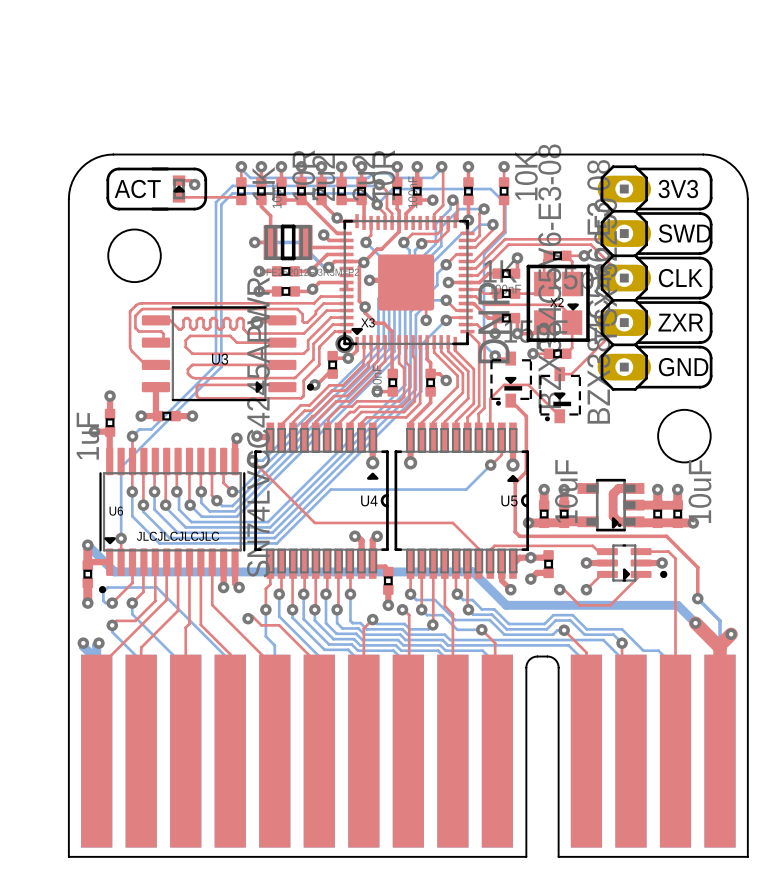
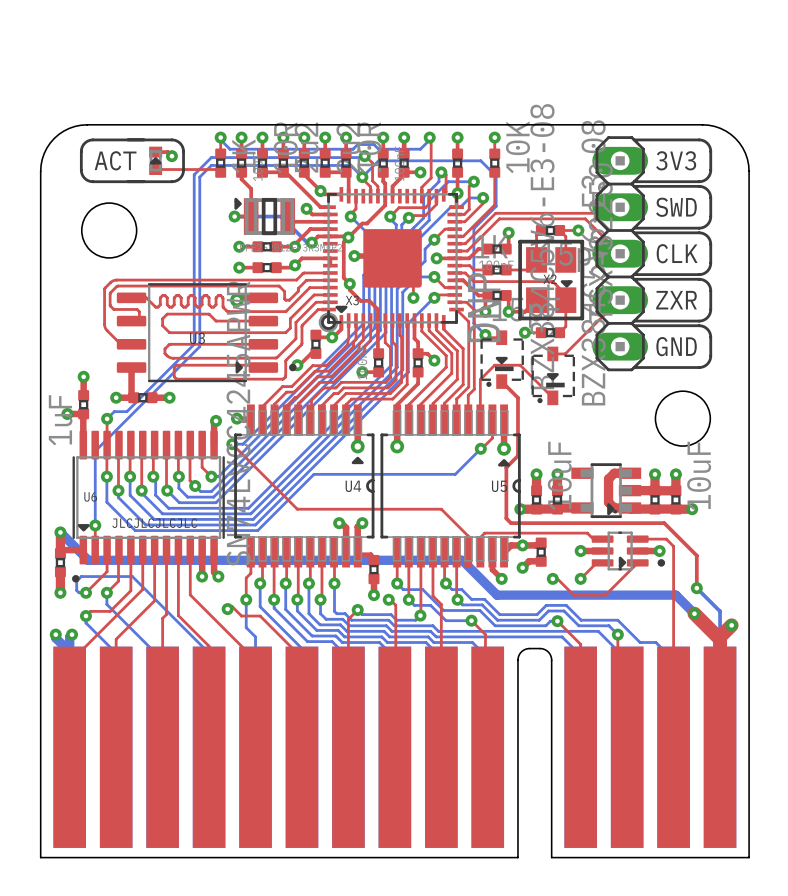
drawing: none -> [234, 197, 242, 210]

